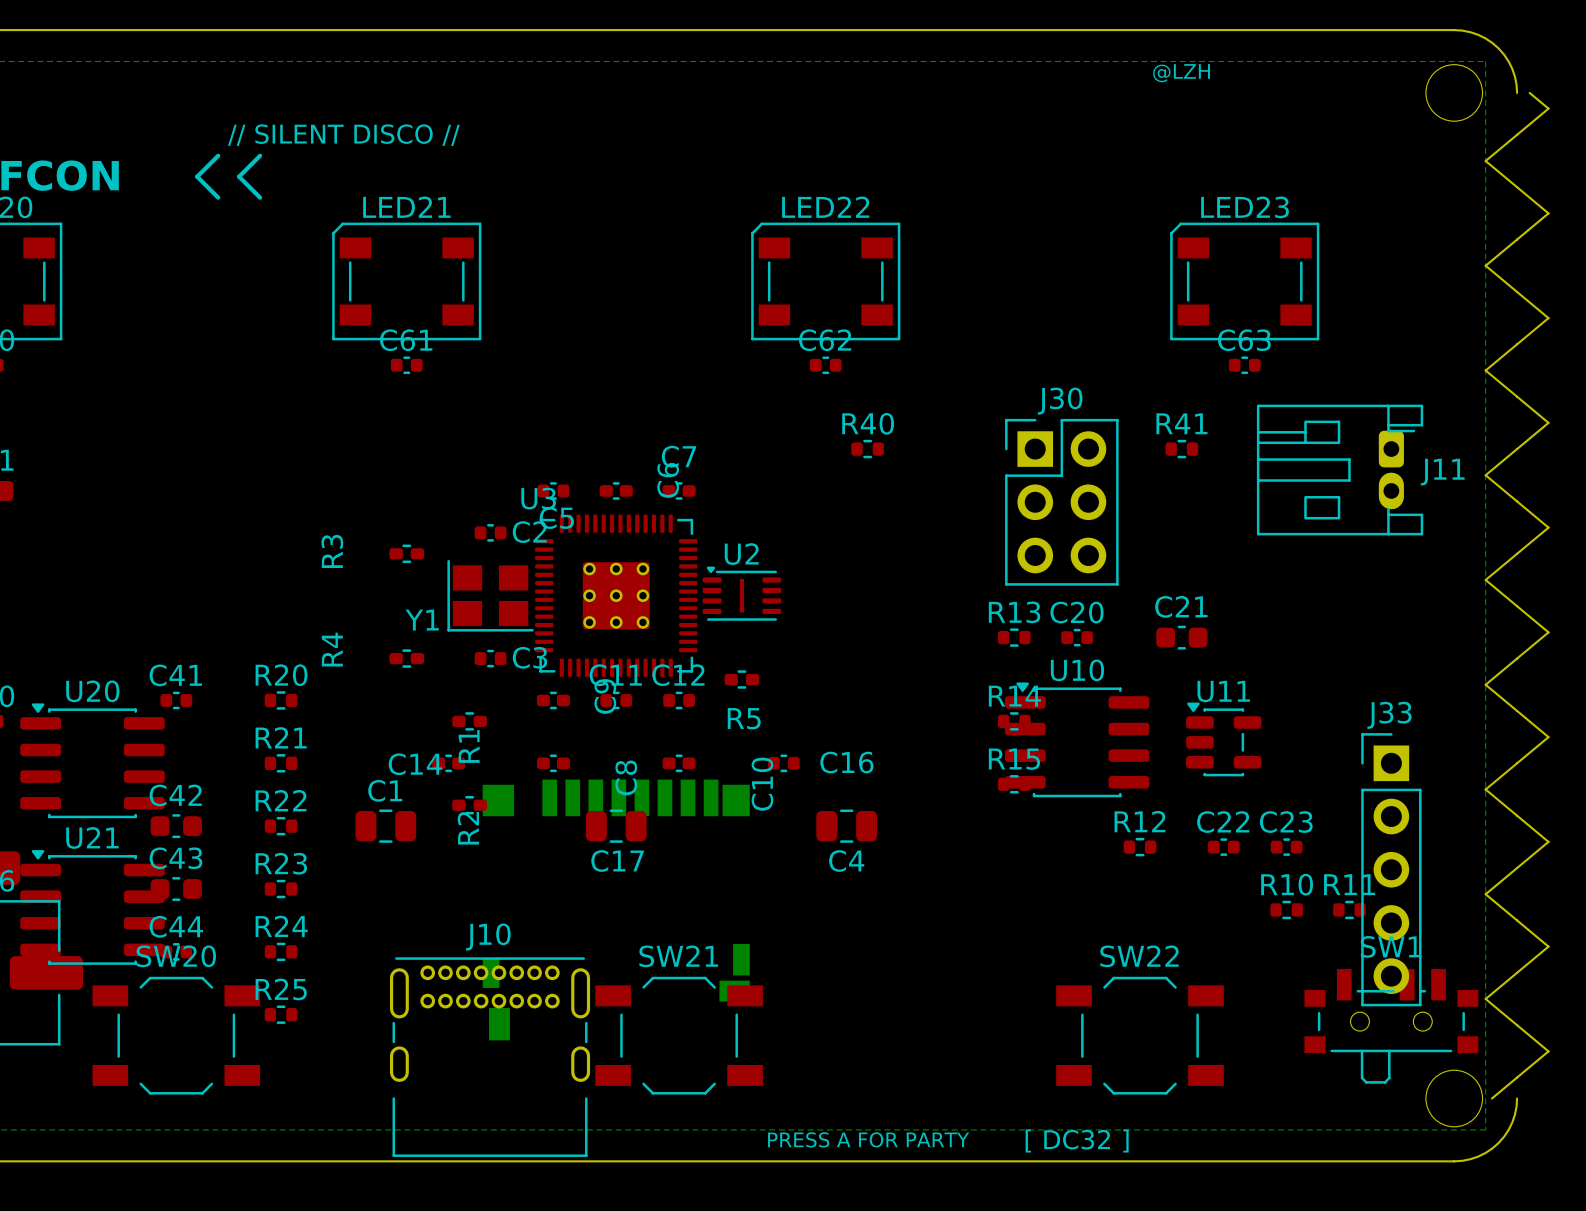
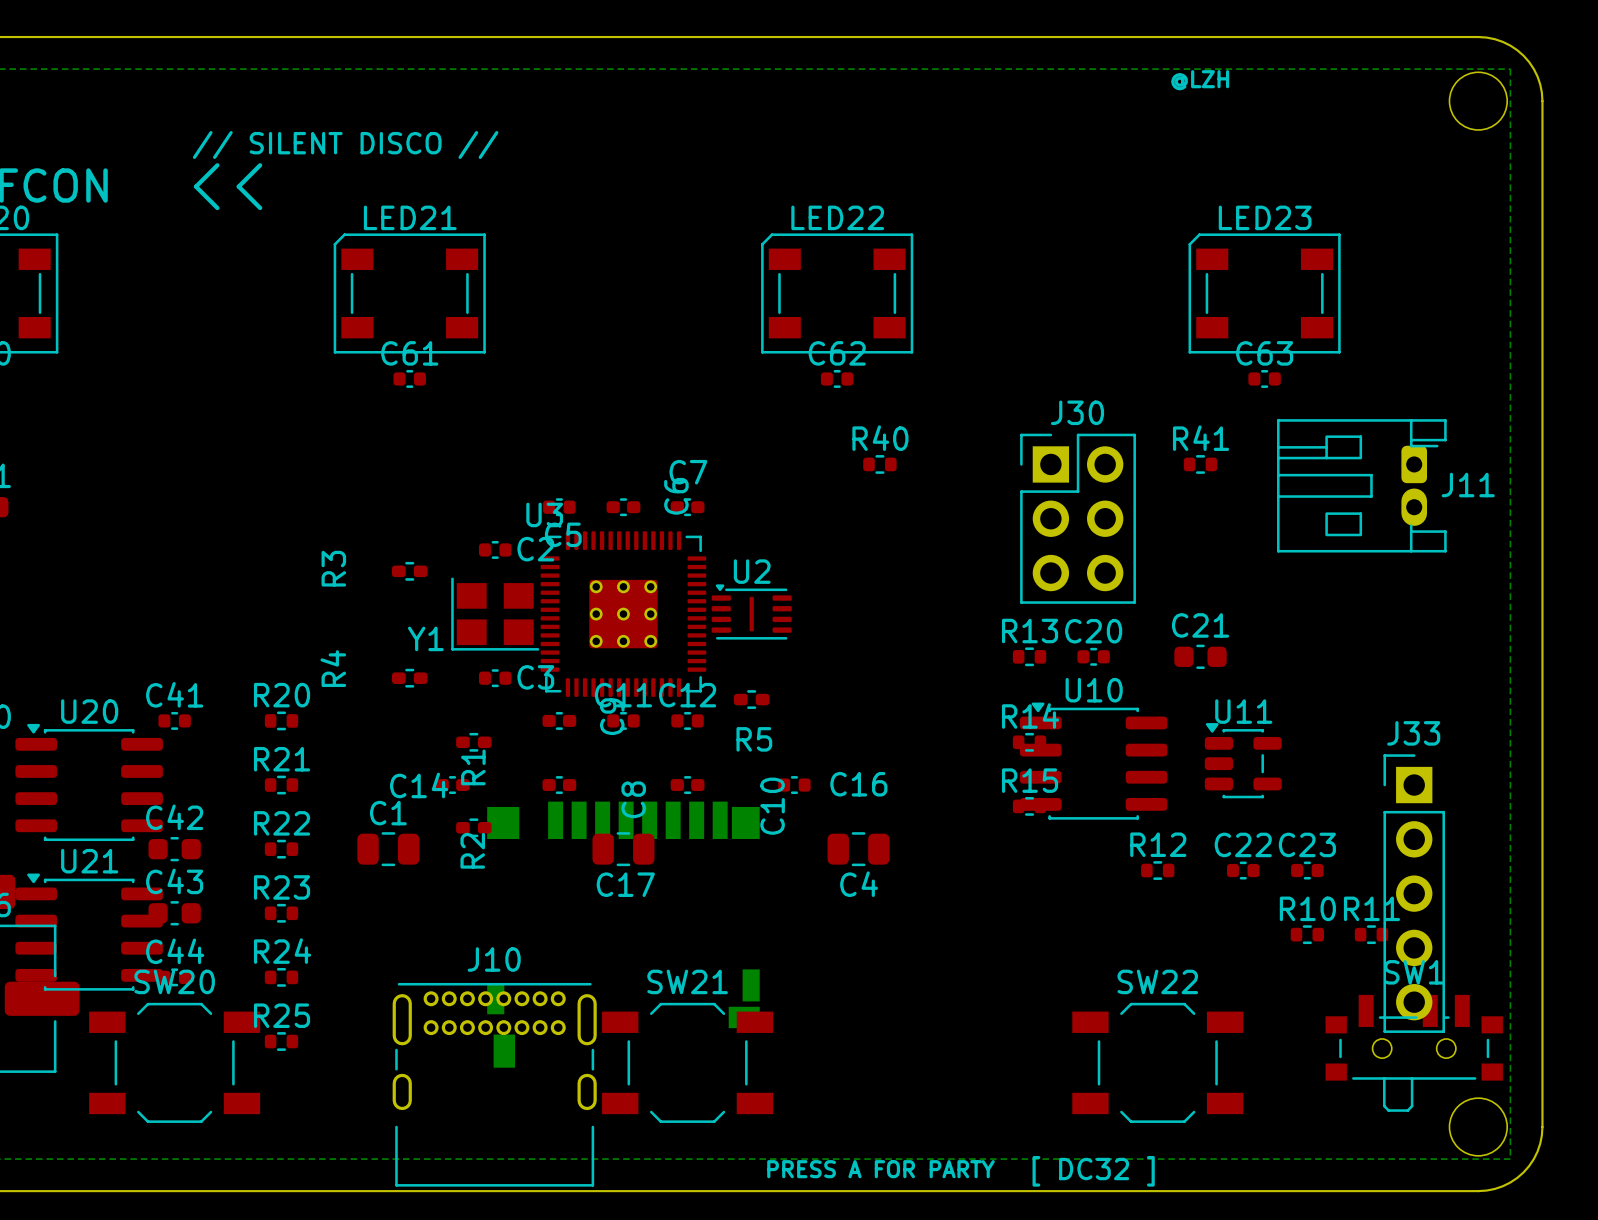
board edge: none -> (1542, 101) (1542, 1126)
board edge: (1529, 92) (1548, 108) (1485, 161) (1548, 213) (1485, 265) (1548, 318) (1485, 370) (1548, 422) (1485, 475) (1548, 527) (1485, 580) (1548, 632) (1485, 684) (1548, 737) (1485, 789) (1548, 841) (1485, 894) (1548, 946) (1485, 998) (1548, 1051) (1491, 1098) -> none

